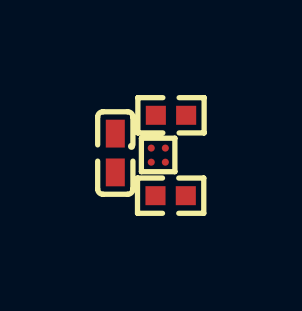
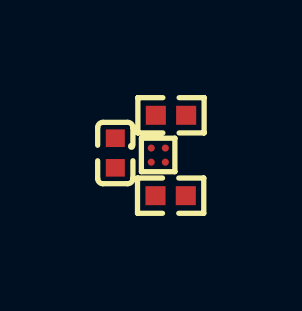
part footprint: [95, 109, 136, 197] -> [95, 119, 136, 187]

